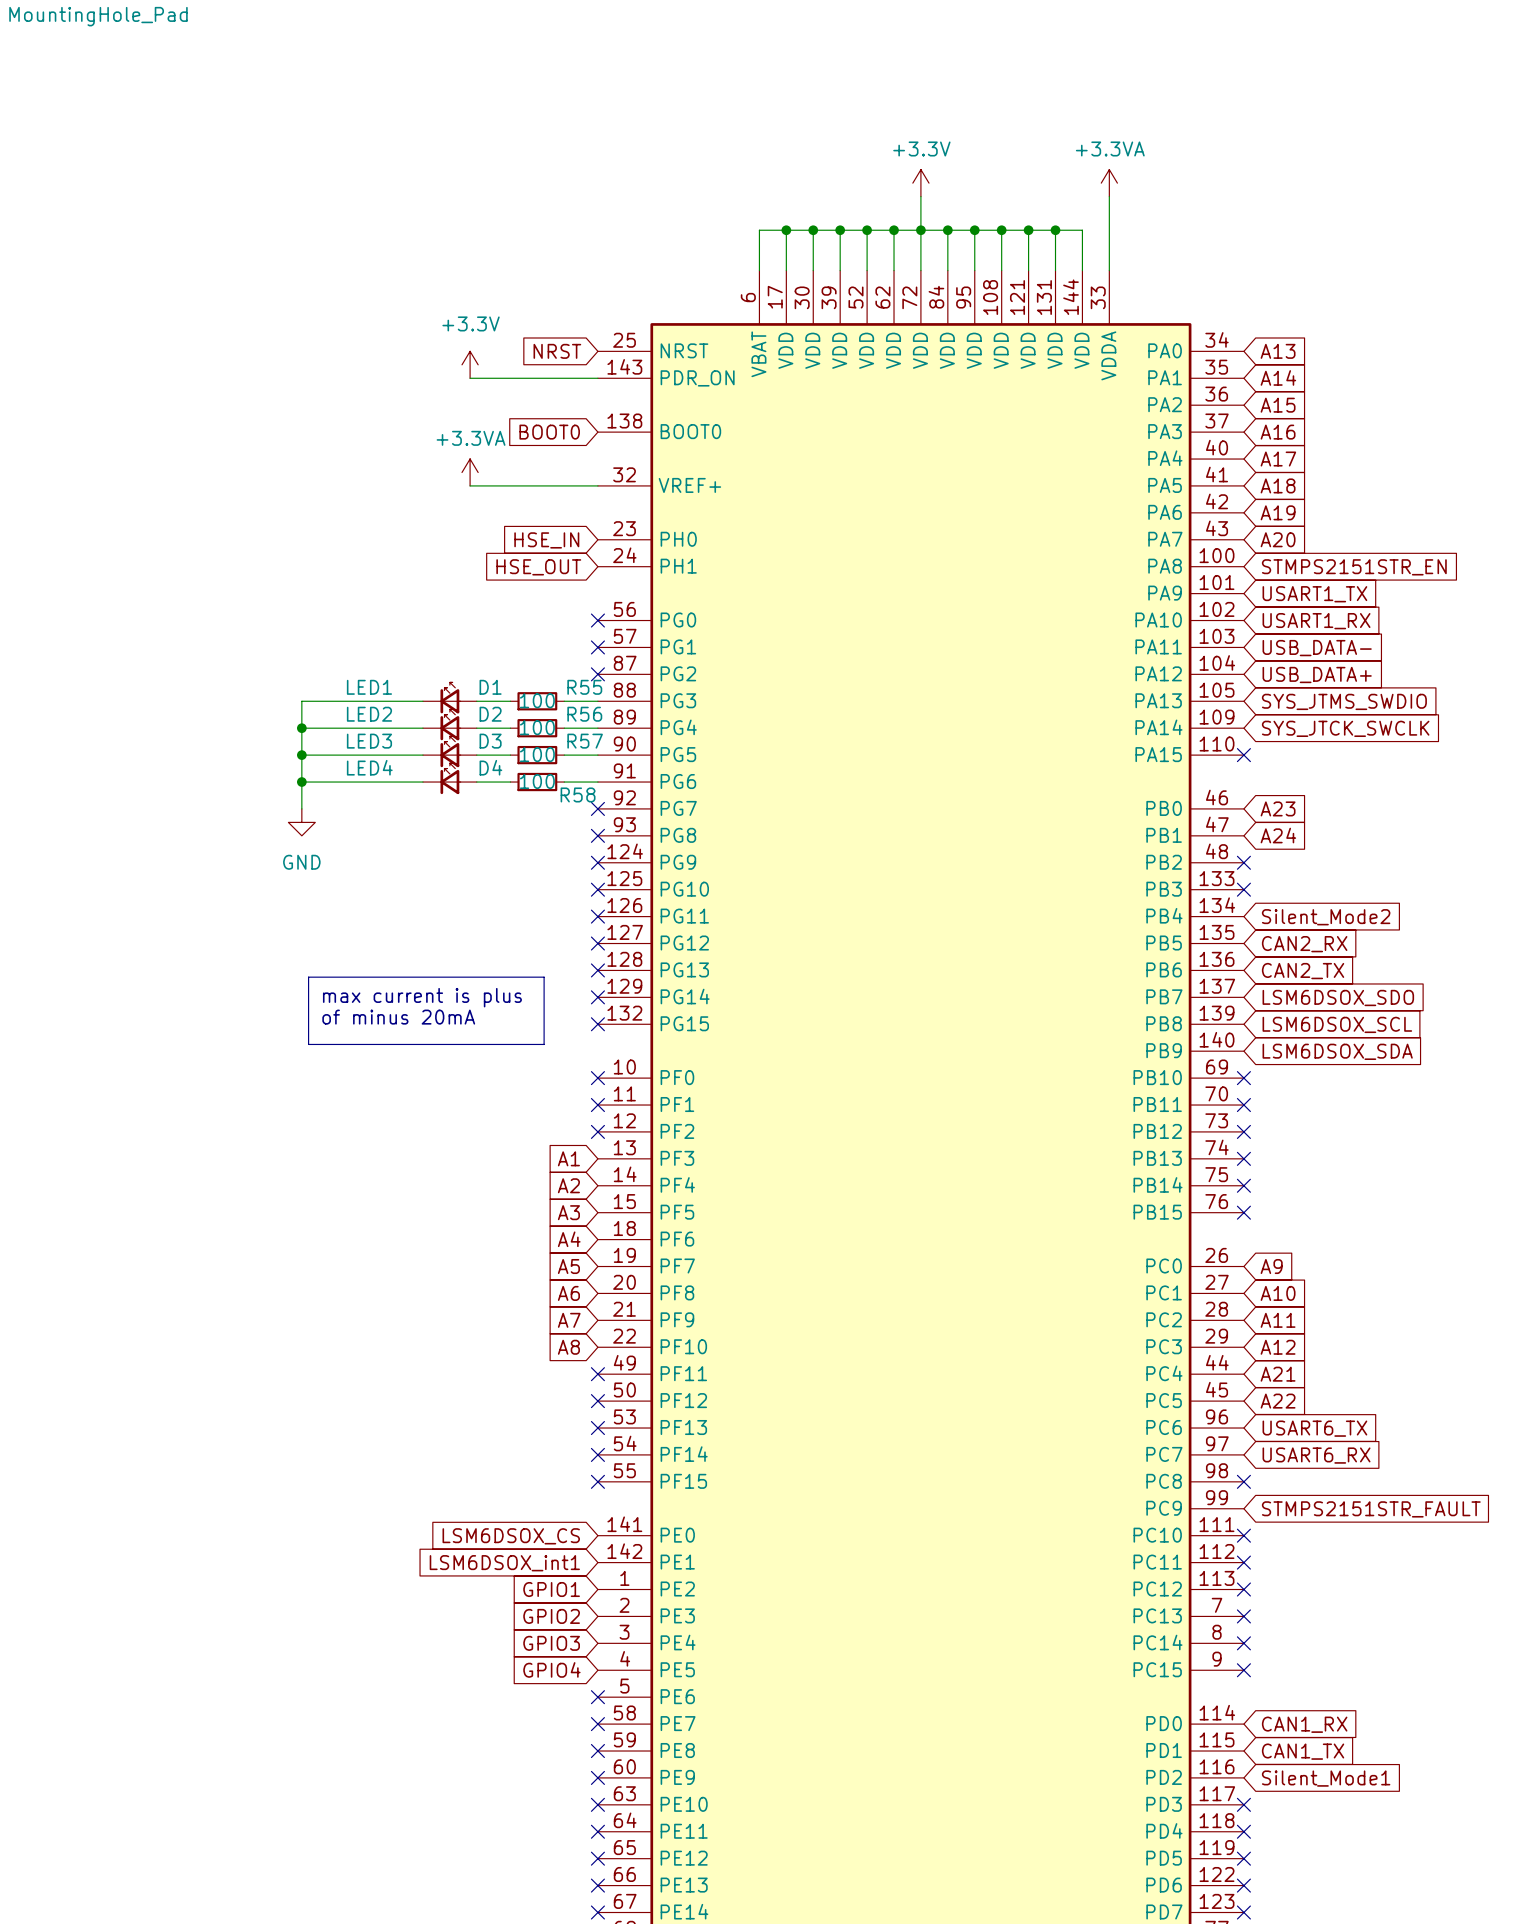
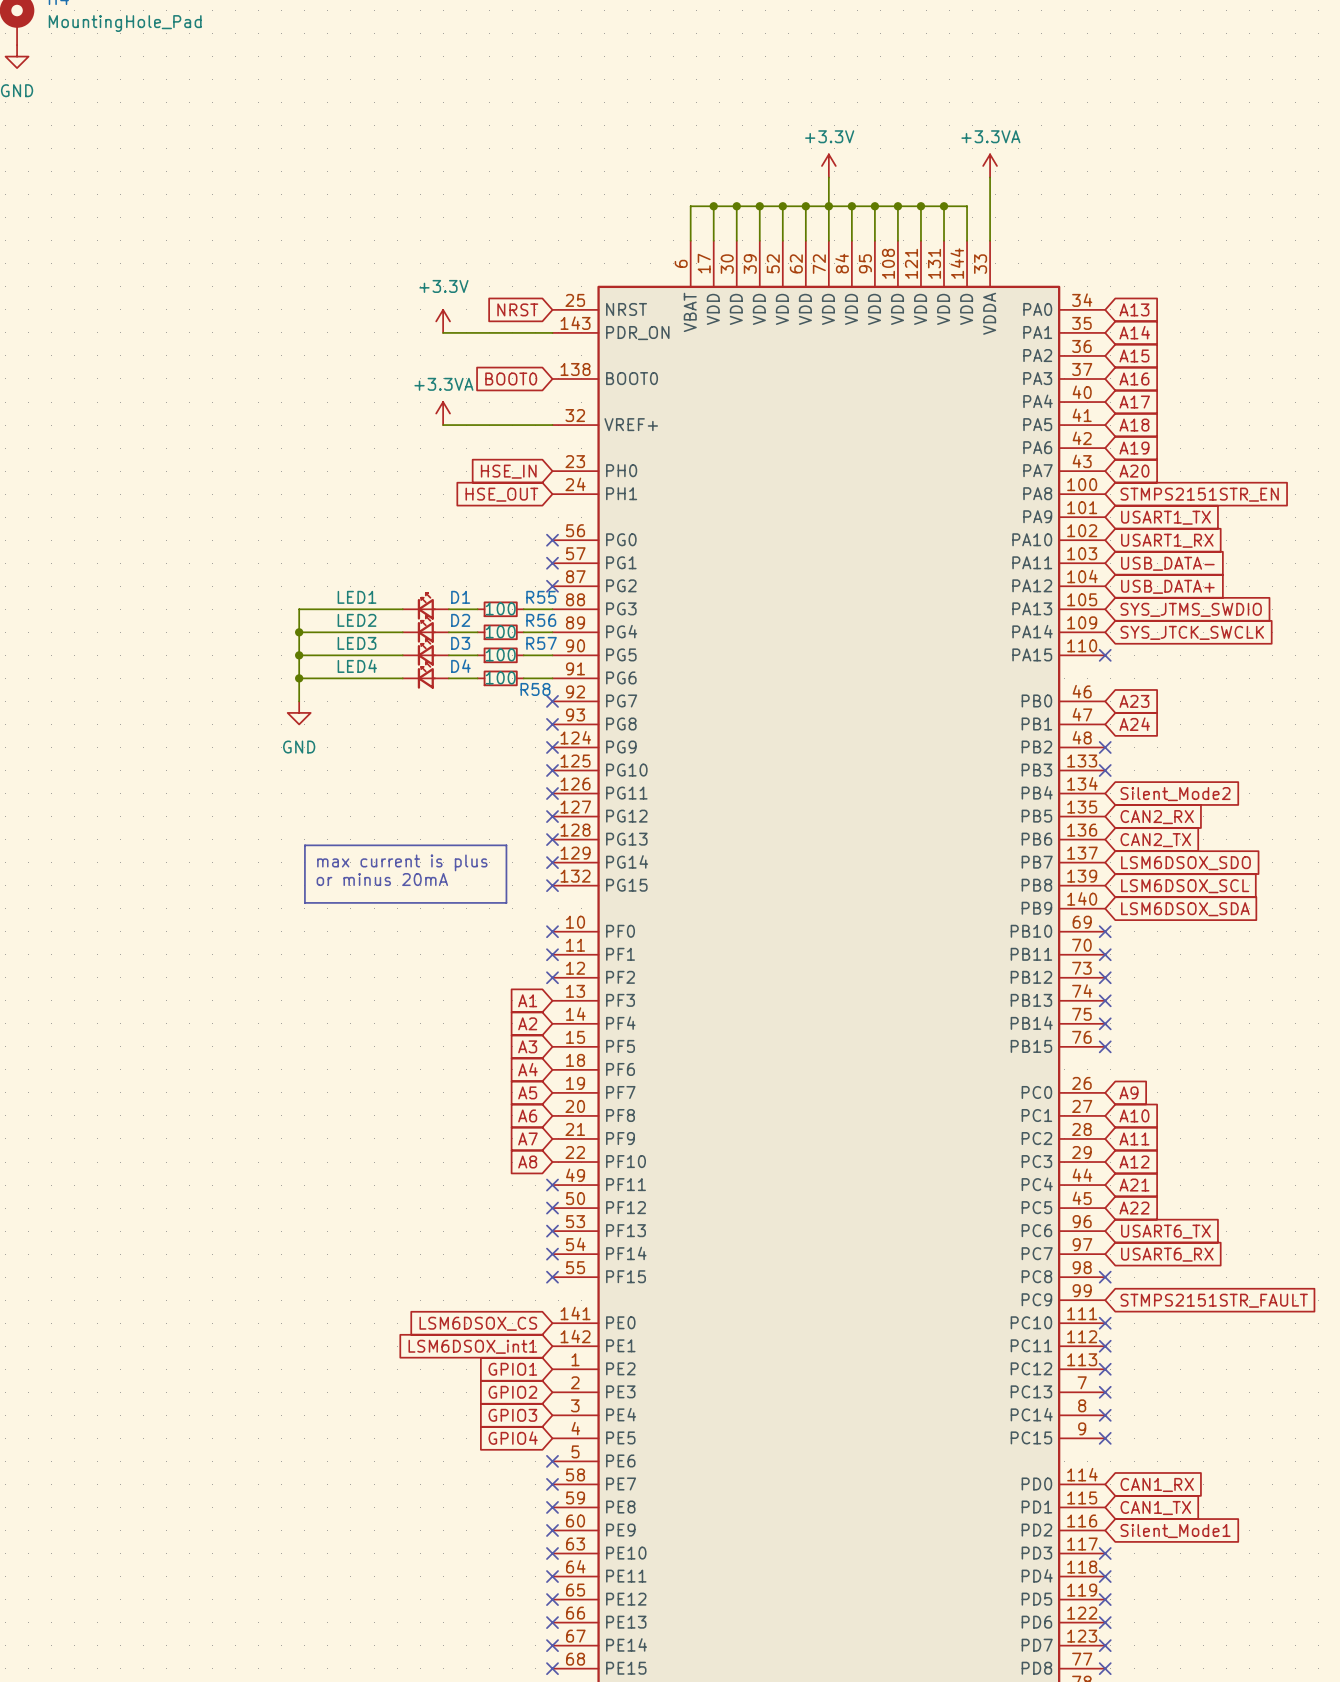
text: of minus 20mA (398, 1017) -> or minus 20mA (382, 879)

